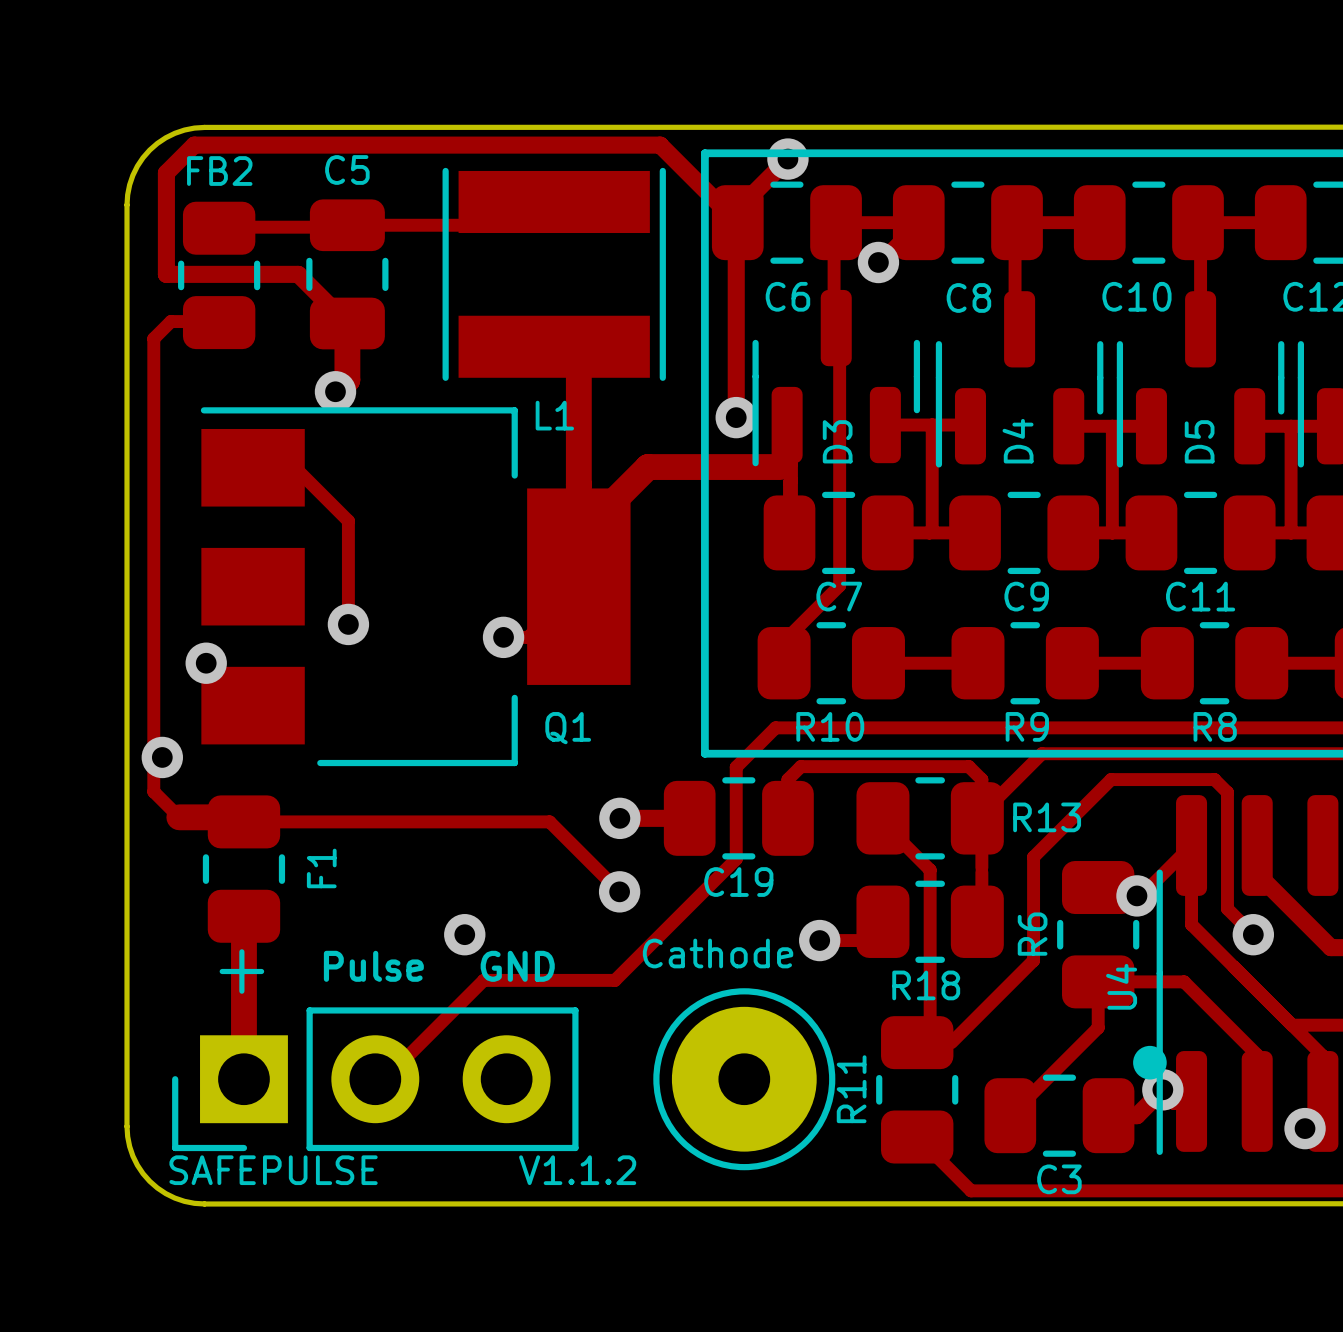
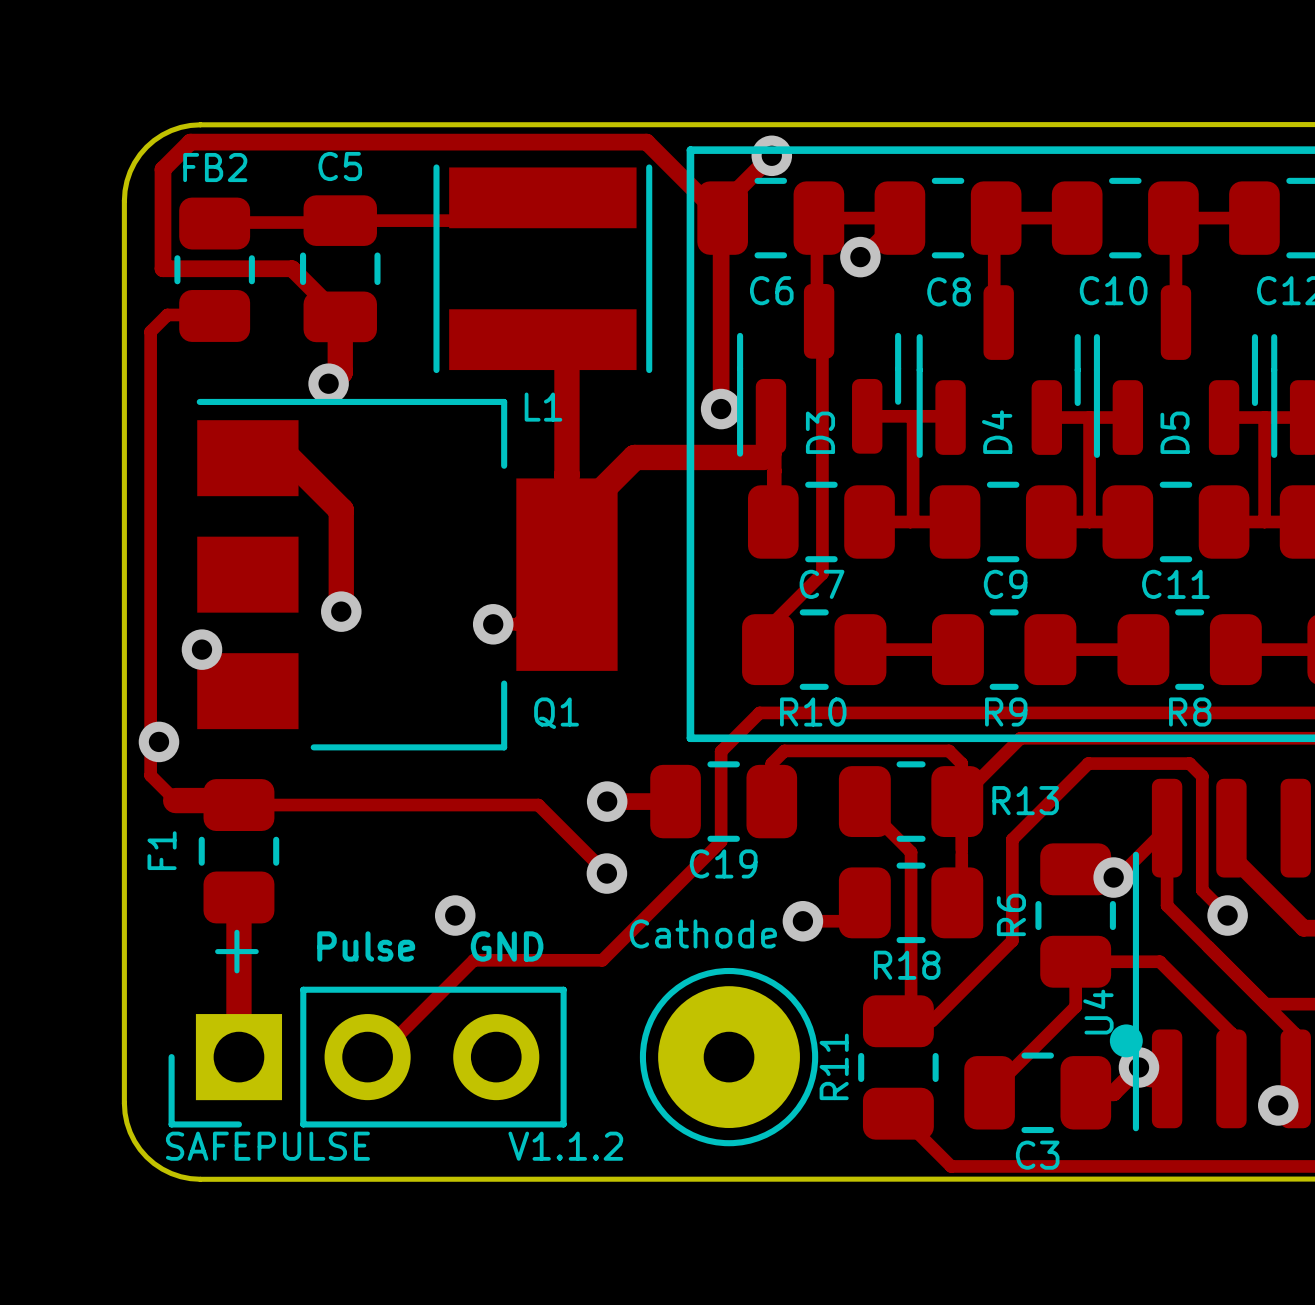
track width: thin (295, 467) (348, 521) (348, 624) -> thick (289, 458) (341, 510) (341, 611)
F1 name position: F1 (321, 868) -> F1 (162, 850)
U4 name position: U4 (1121, 986) -> U4 (1098, 1012)

